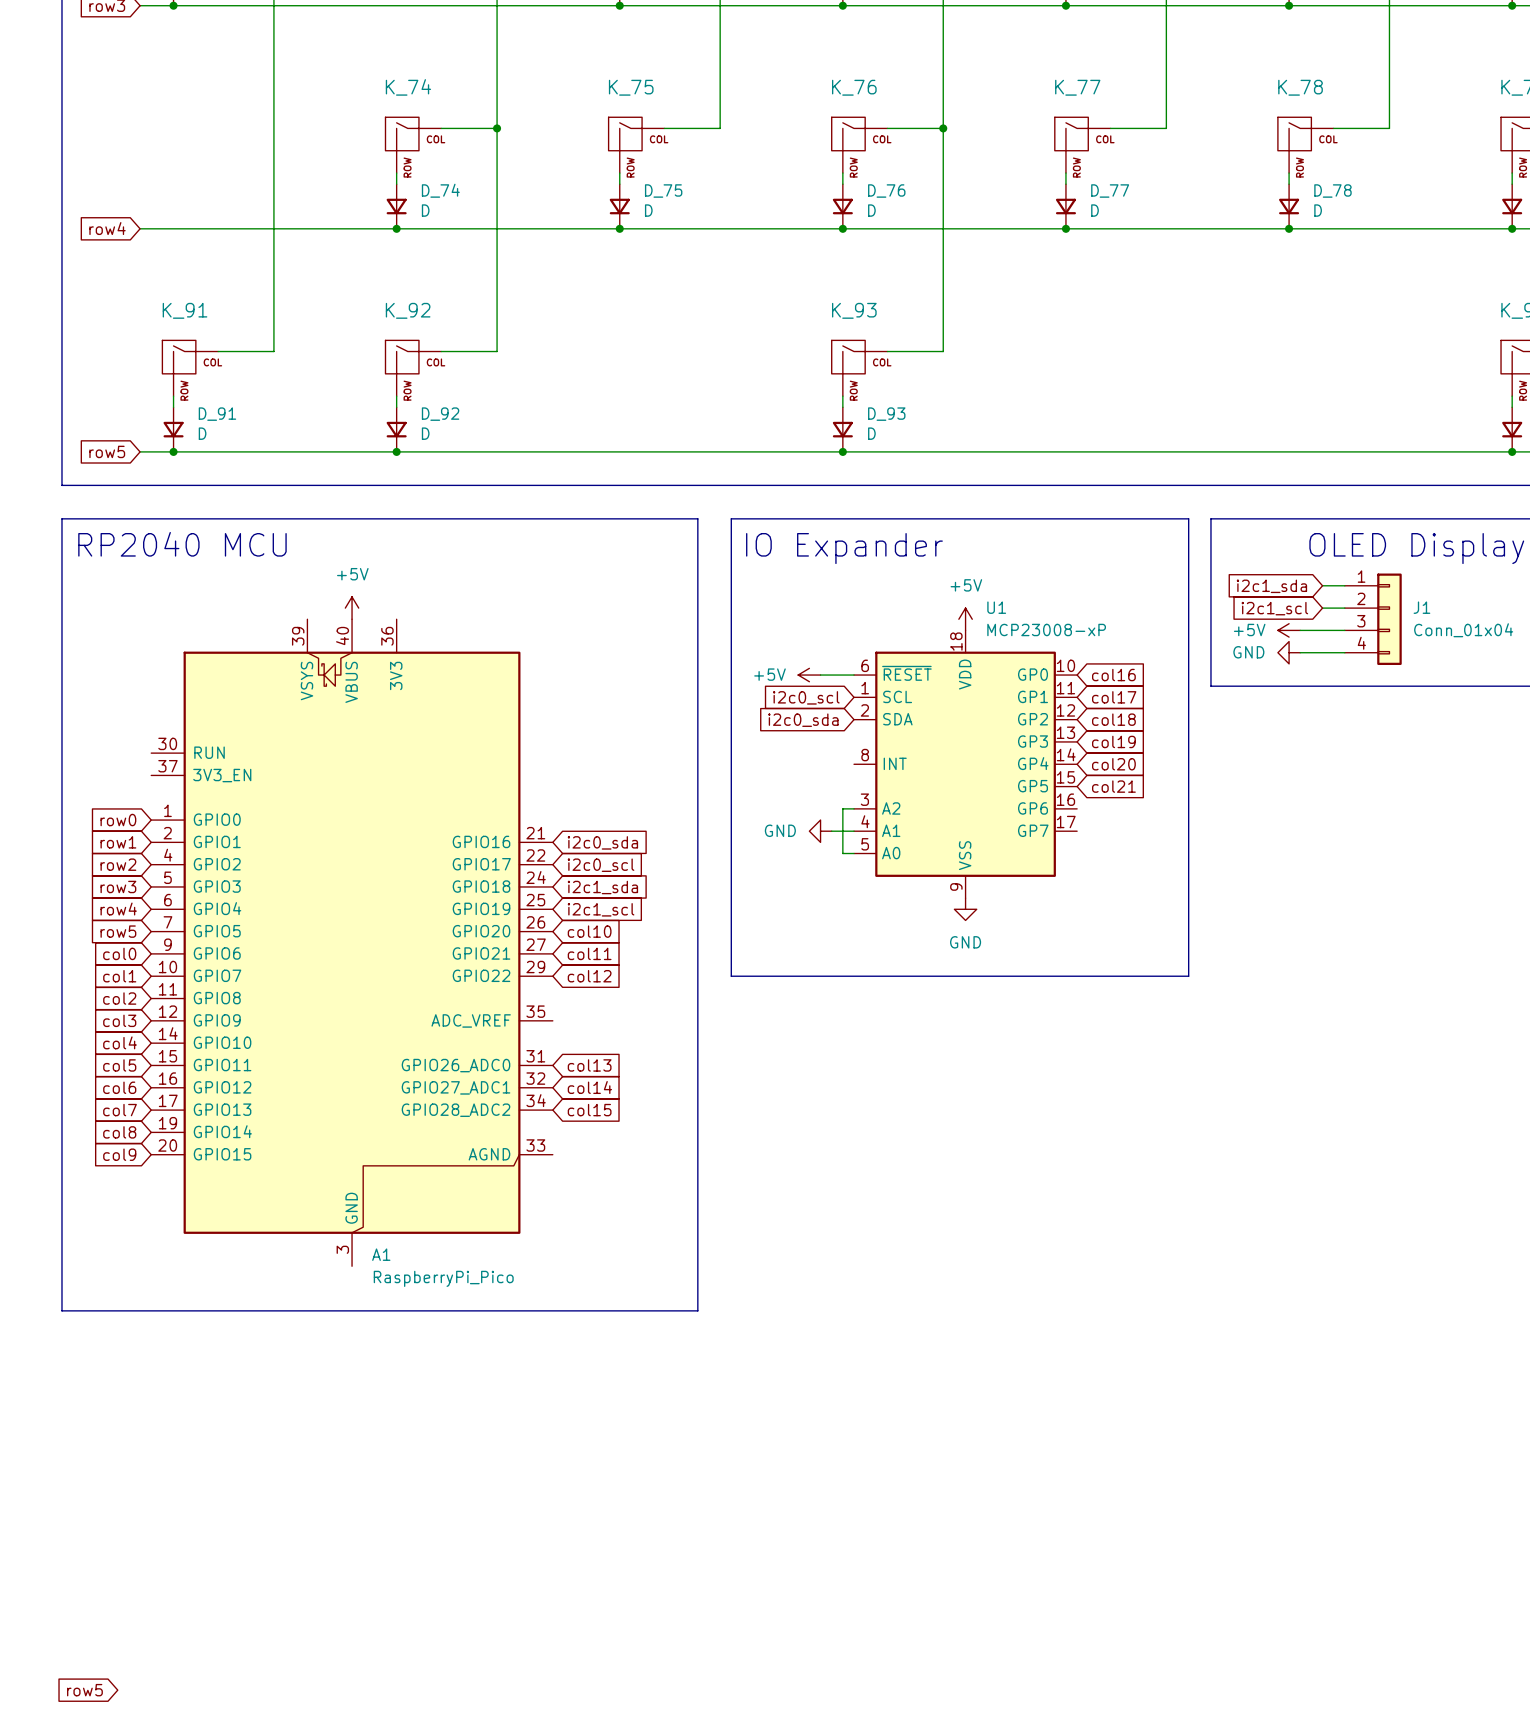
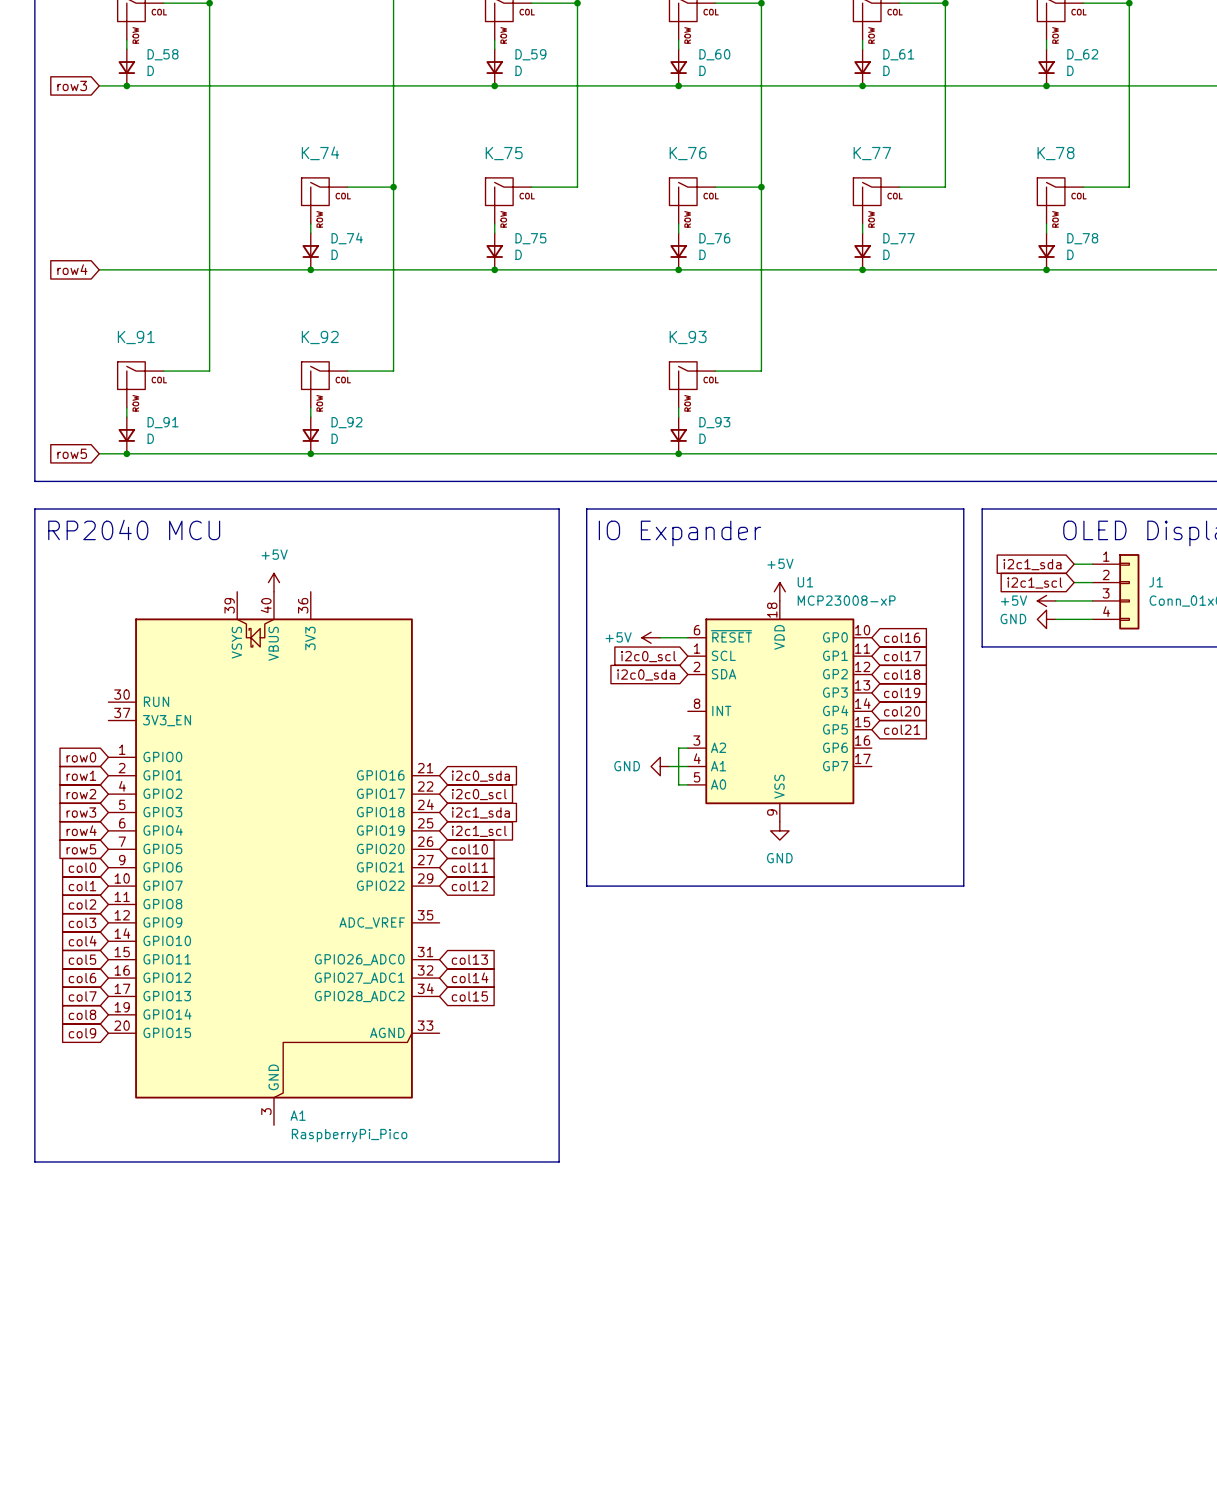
global label: row5 (84, 1690) -> none

